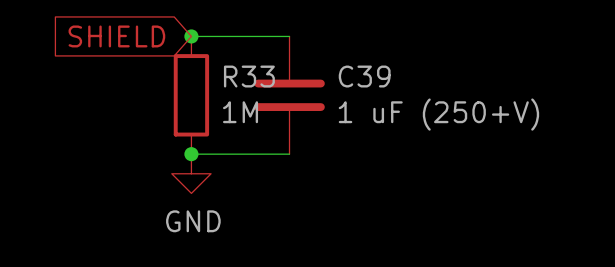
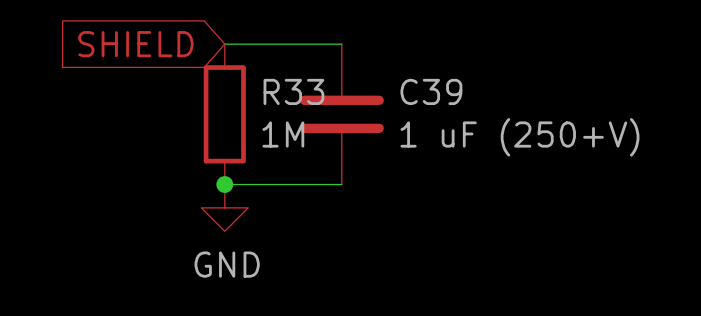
junction: (191, 36) -> none

